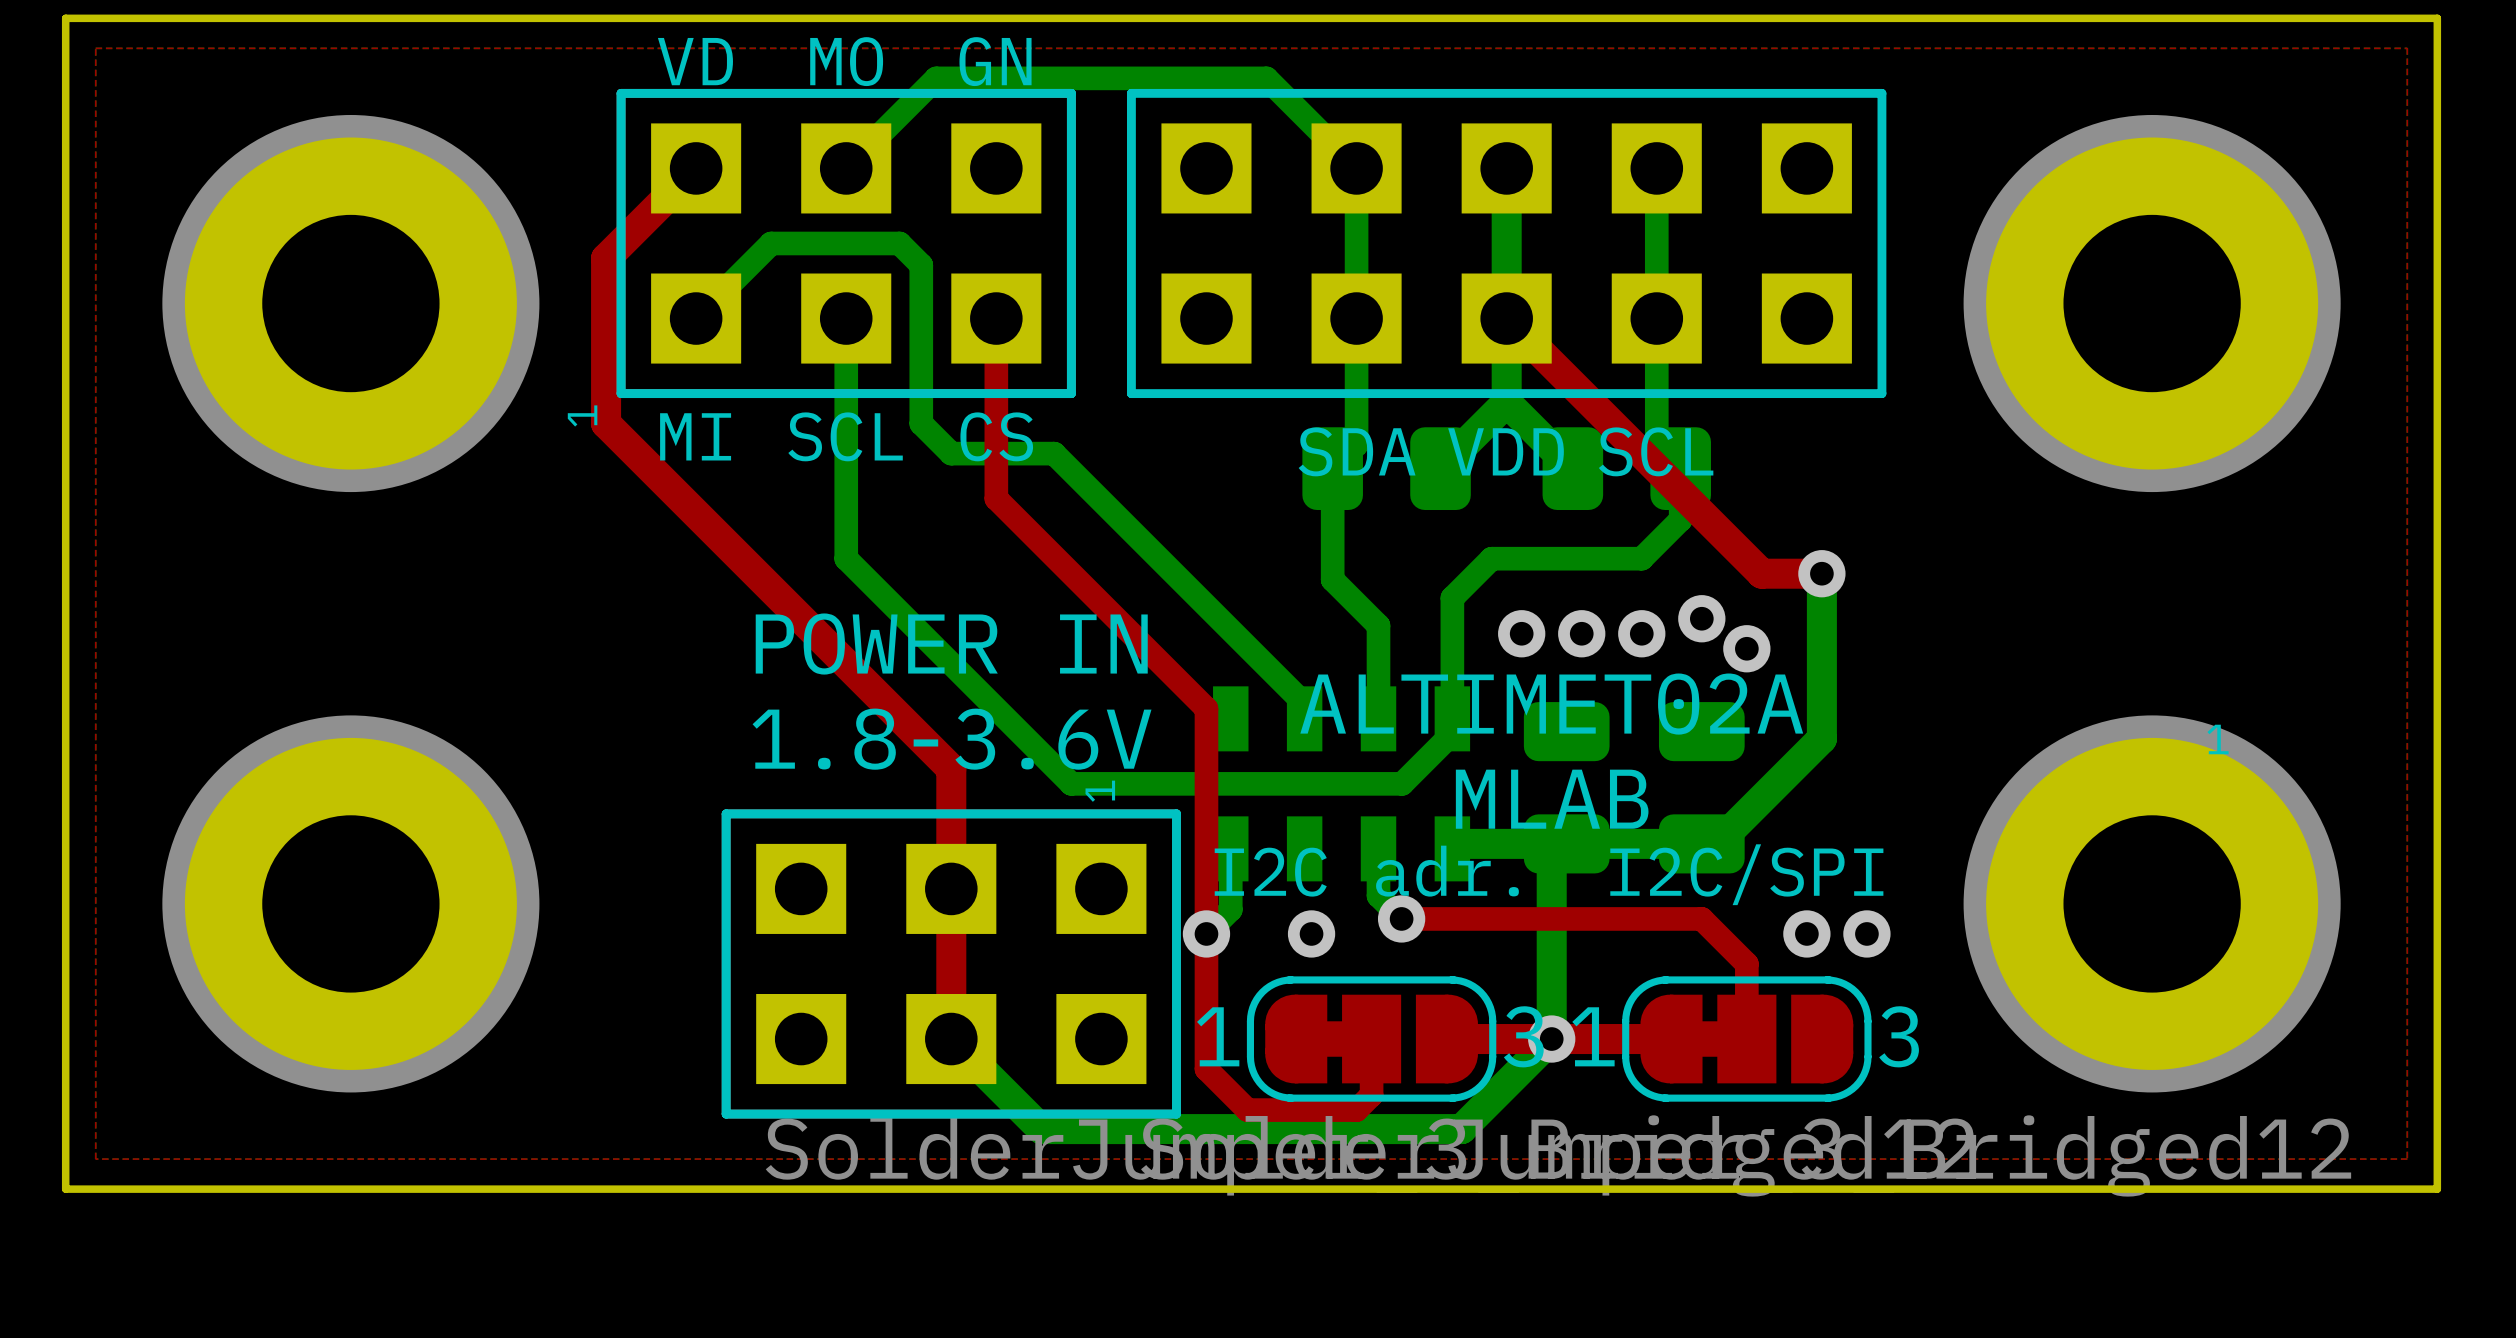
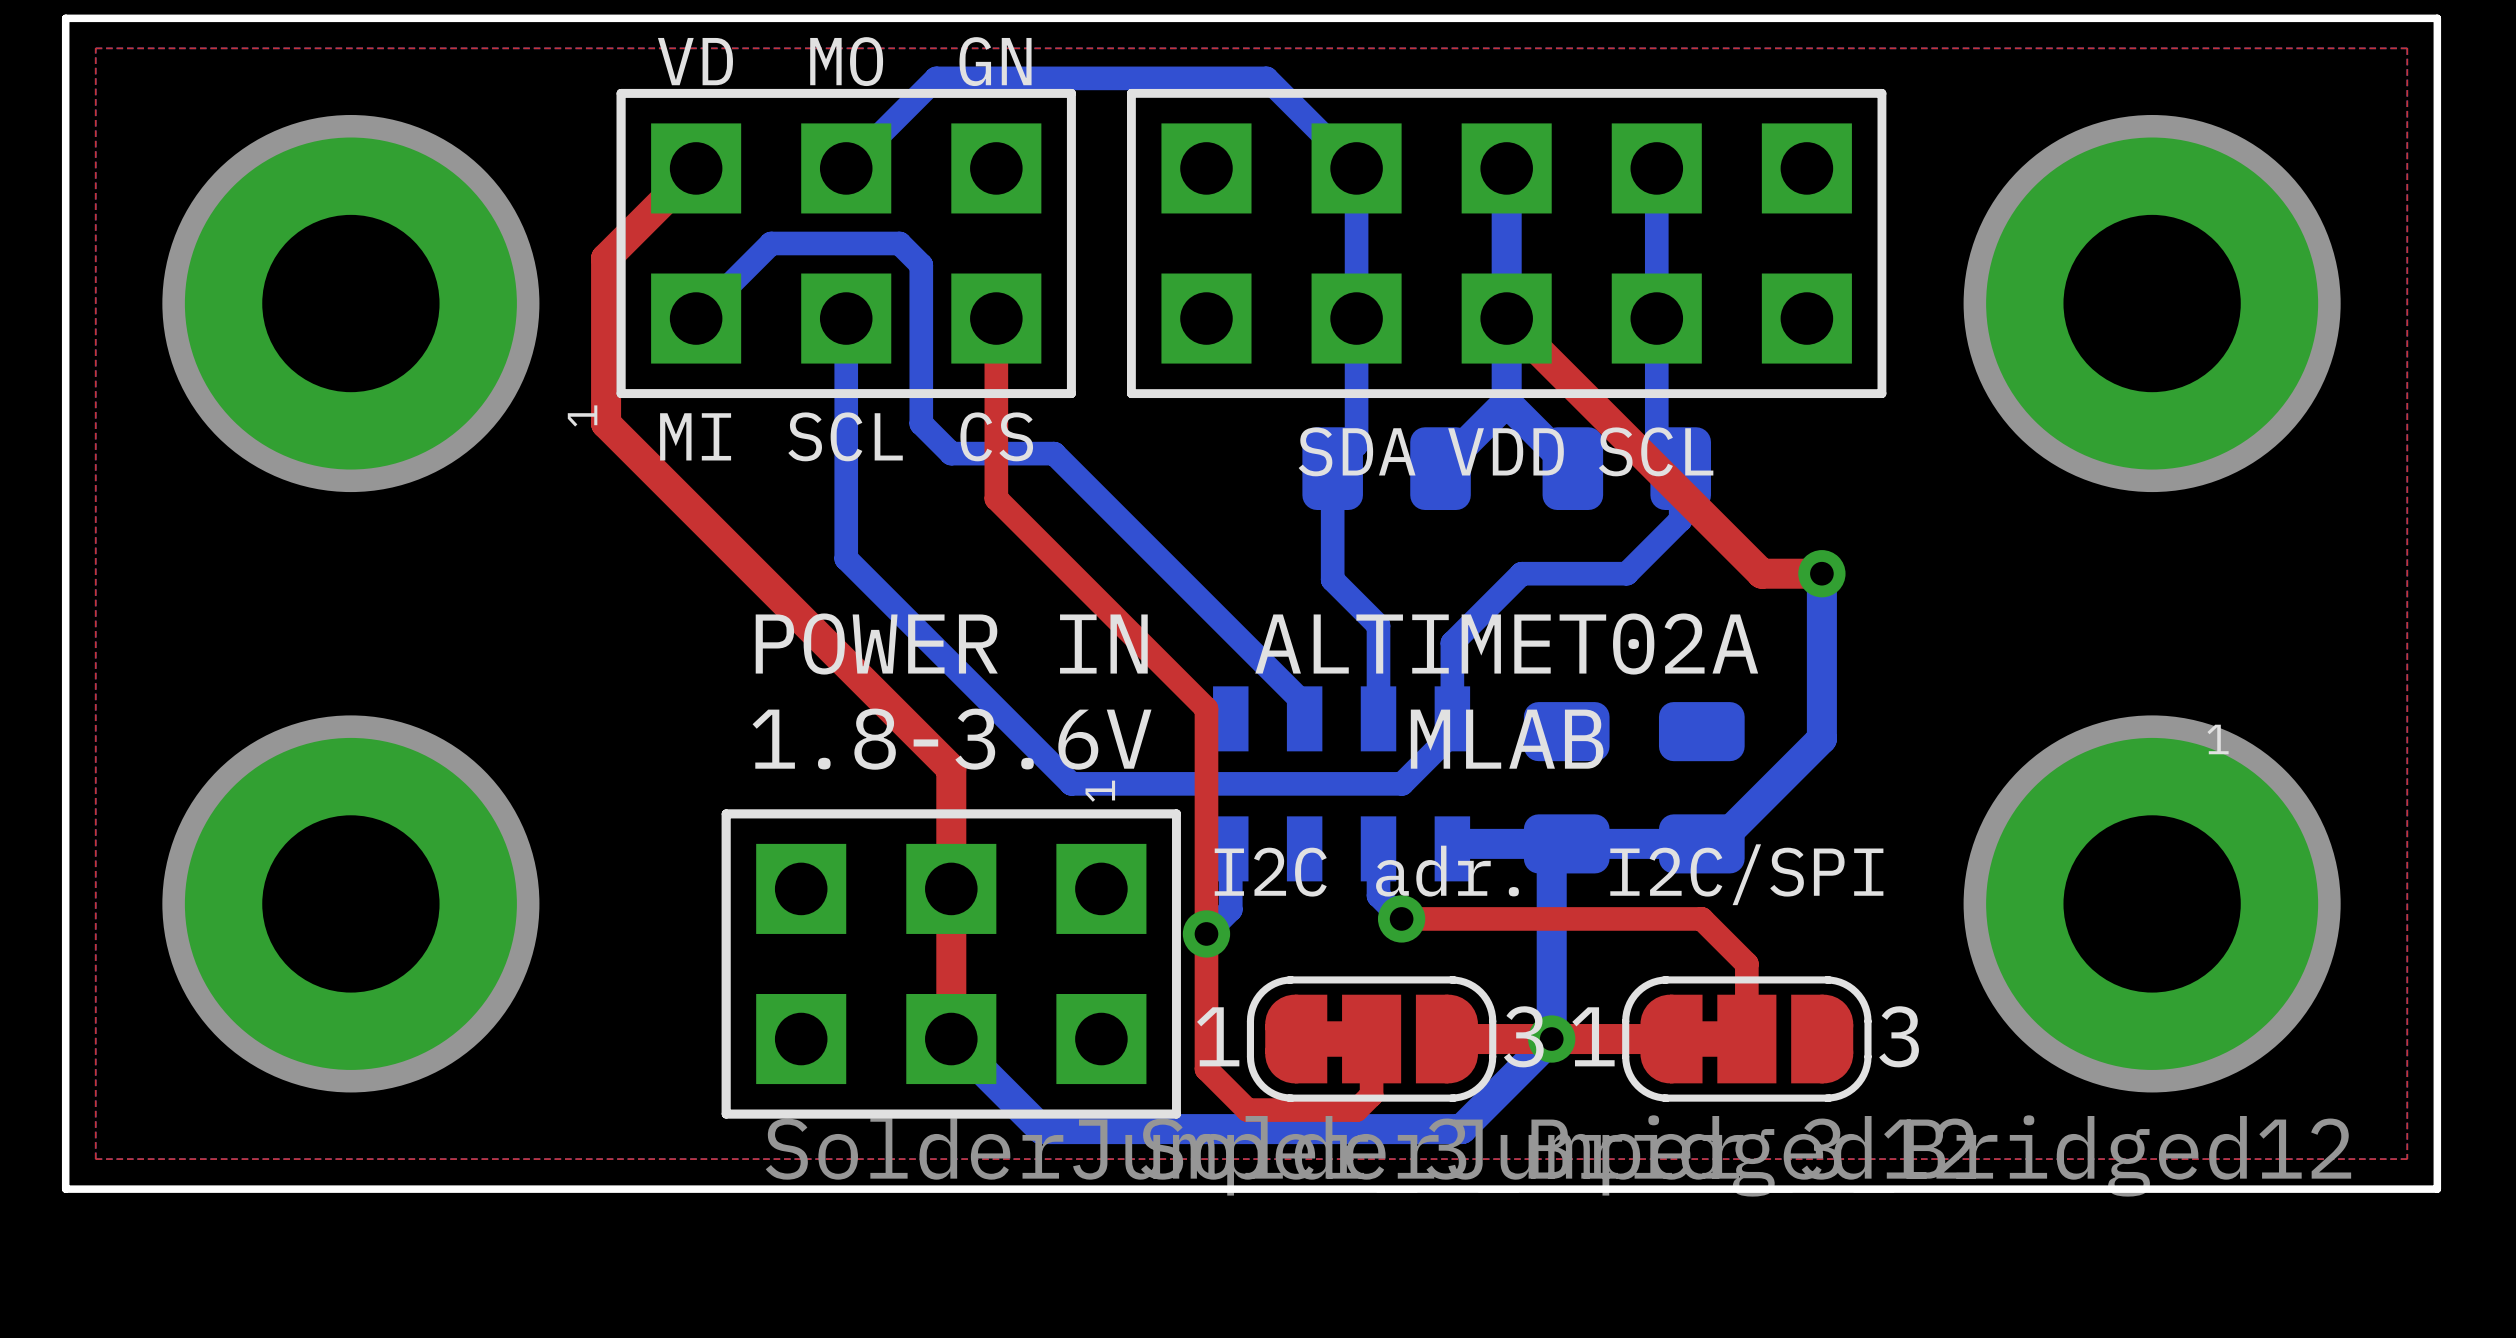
bottom track: (1641, 558) (1491, 558) (1452, 598) (1452, 643) -> (1641, 558) (1626, 573) (1521, 573) (1452, 643)
via: (1701, 618) -> none
via: (1521, 633) -> none
via: (1581, 633) -> none
via: (1641, 633) -> none
via: (1746, 648) -> none
text position: ALTIMET02A (1551, 704) -> ALTIMET02A (1506, 644)
text position: MLAB (1552, 799) -> MLAB (1507, 739)
via: (1311, 933) -> none
via: (1806, 933) -> none
via: (1866, 933) -> none

